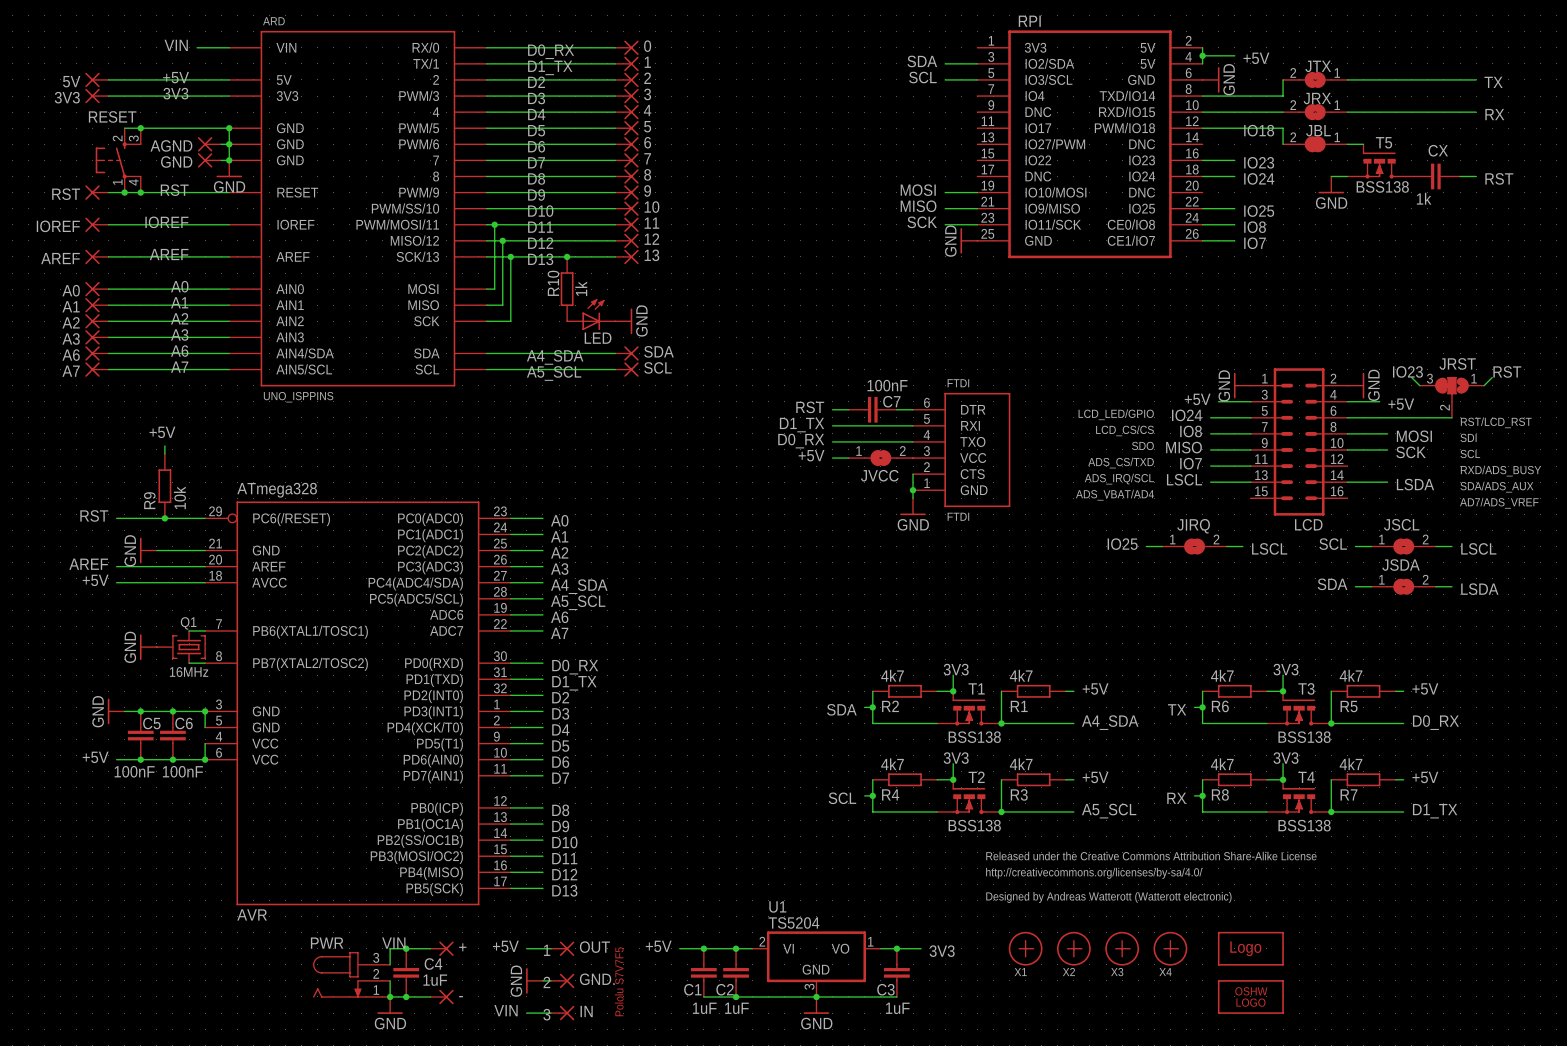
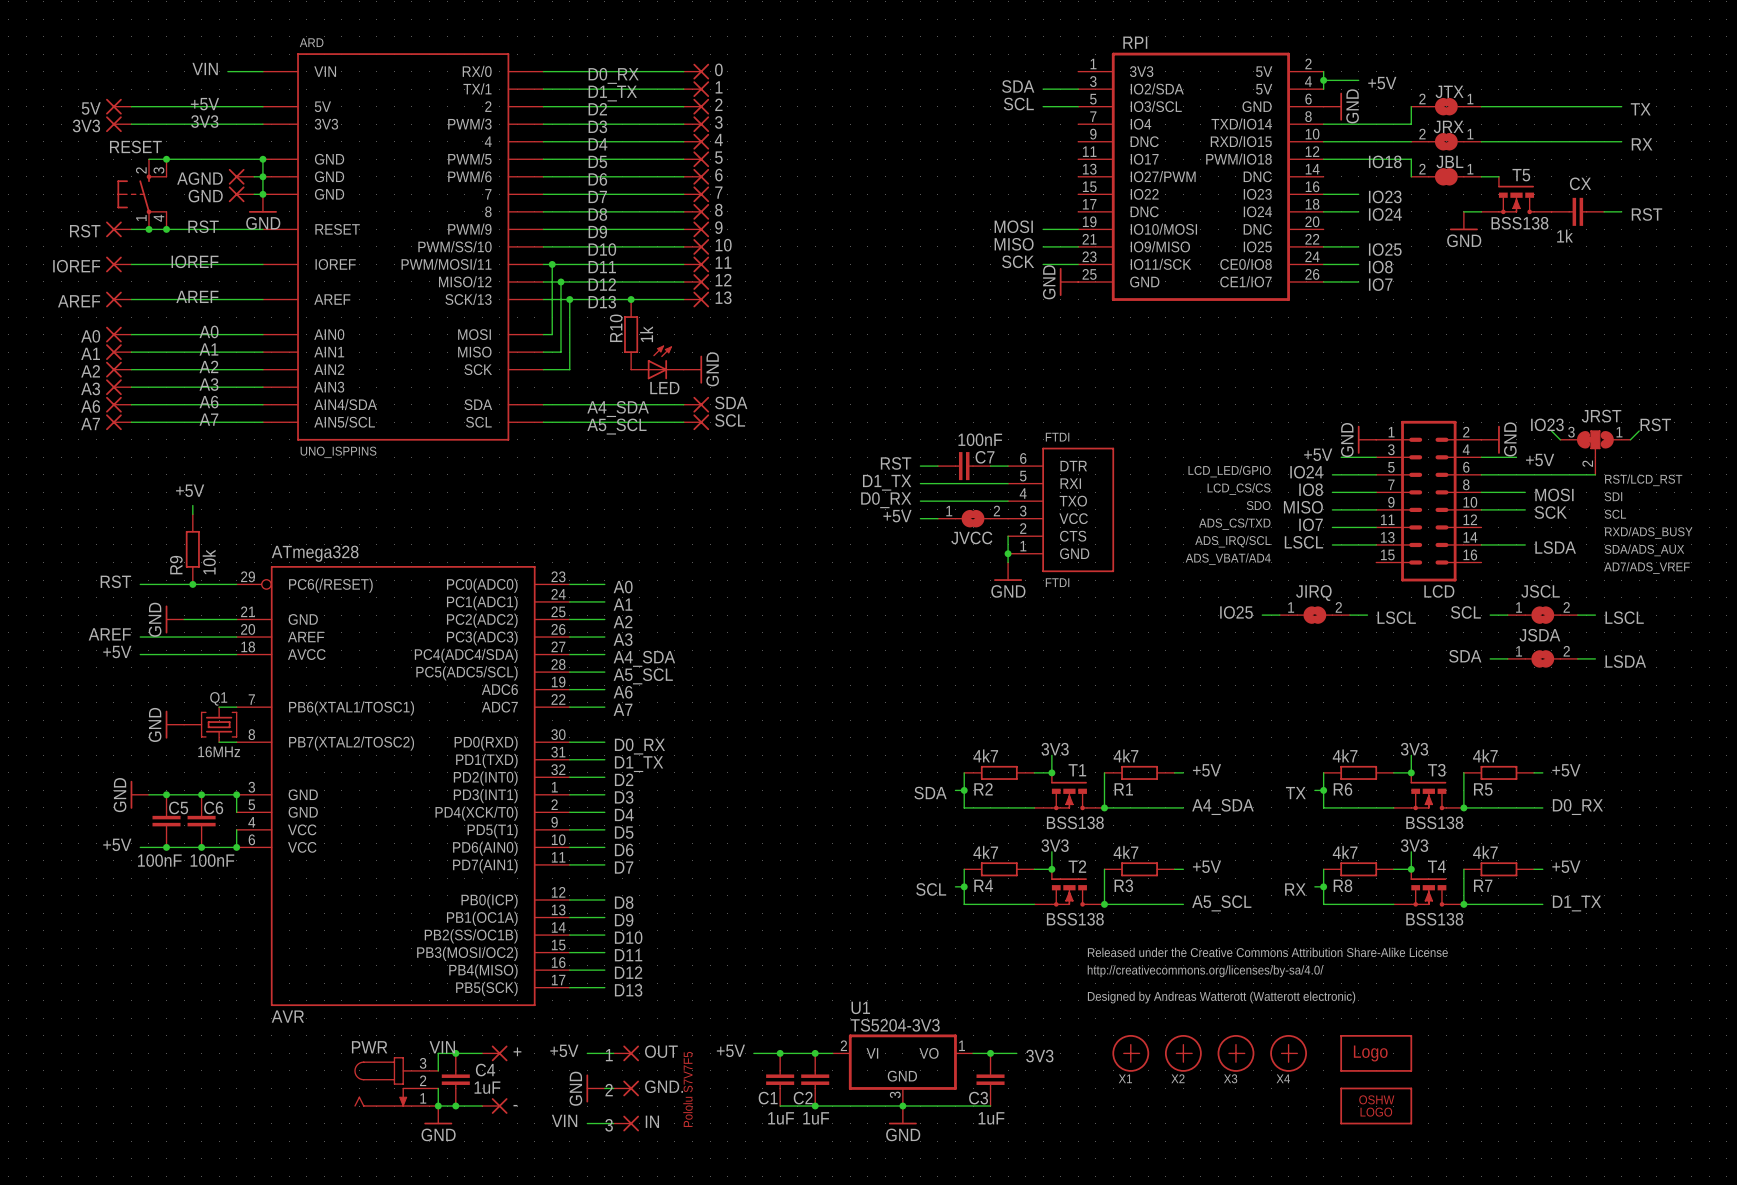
U1 value: TS5204 (793, 922) -> TS5204-3V3 (895, 1025)

